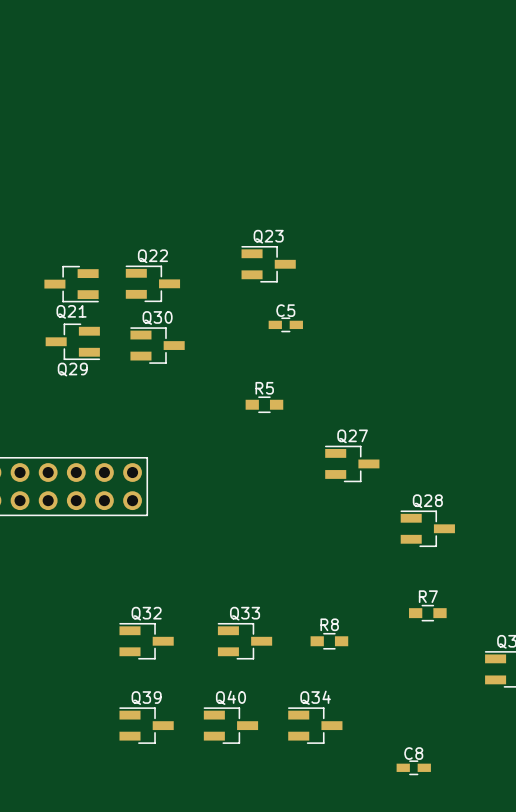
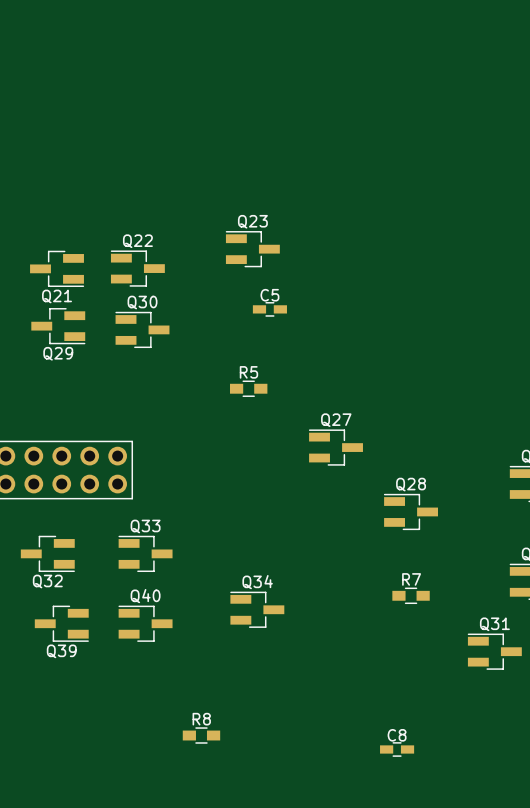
Q32 rotation: 0° (146, 641) -> 180° (47, 553)
Q32 position: (146, 641) -> (47, 553)
Q33 position: (244, 641) -> (145, 553)
R8 position: (329, 641) -> (201, 735)
Q39 rotation: 0° (146, 725) -> 180° (61, 623)
Q39 position: (146, 725) -> (61, 623)
Q40 position: (230, 725) -> (145, 623)
Q34 position: (315, 725) -> (257, 609)

